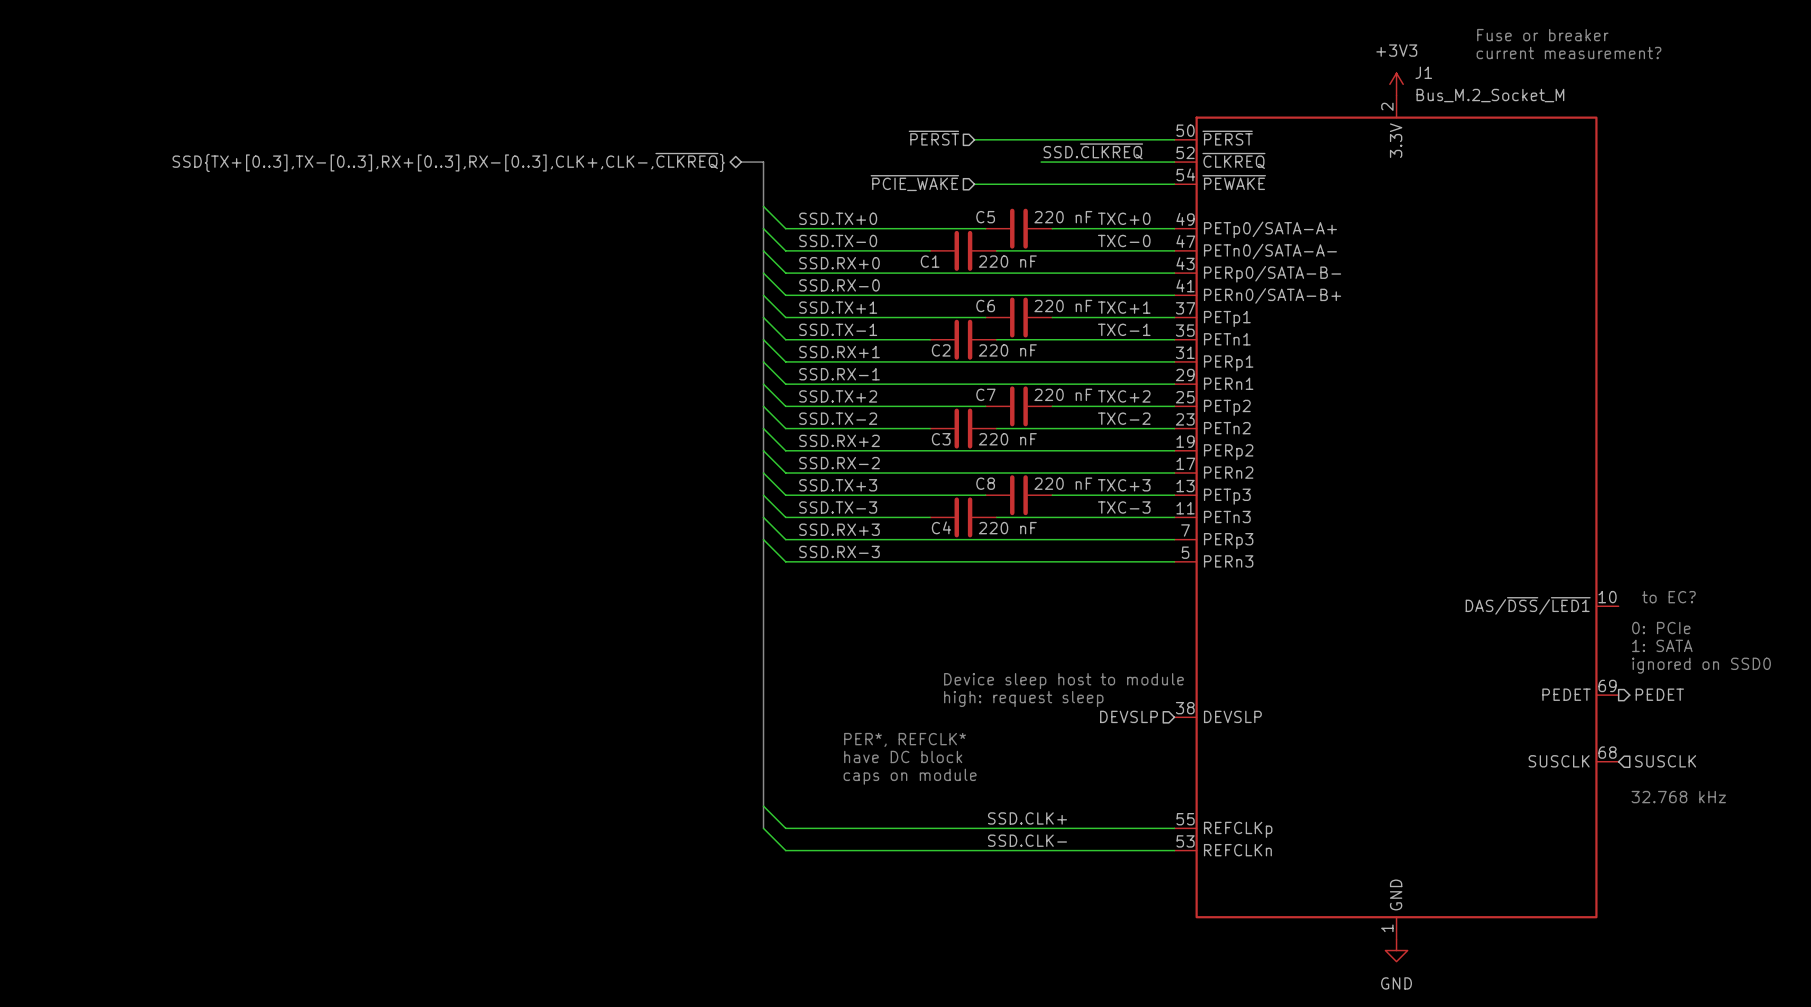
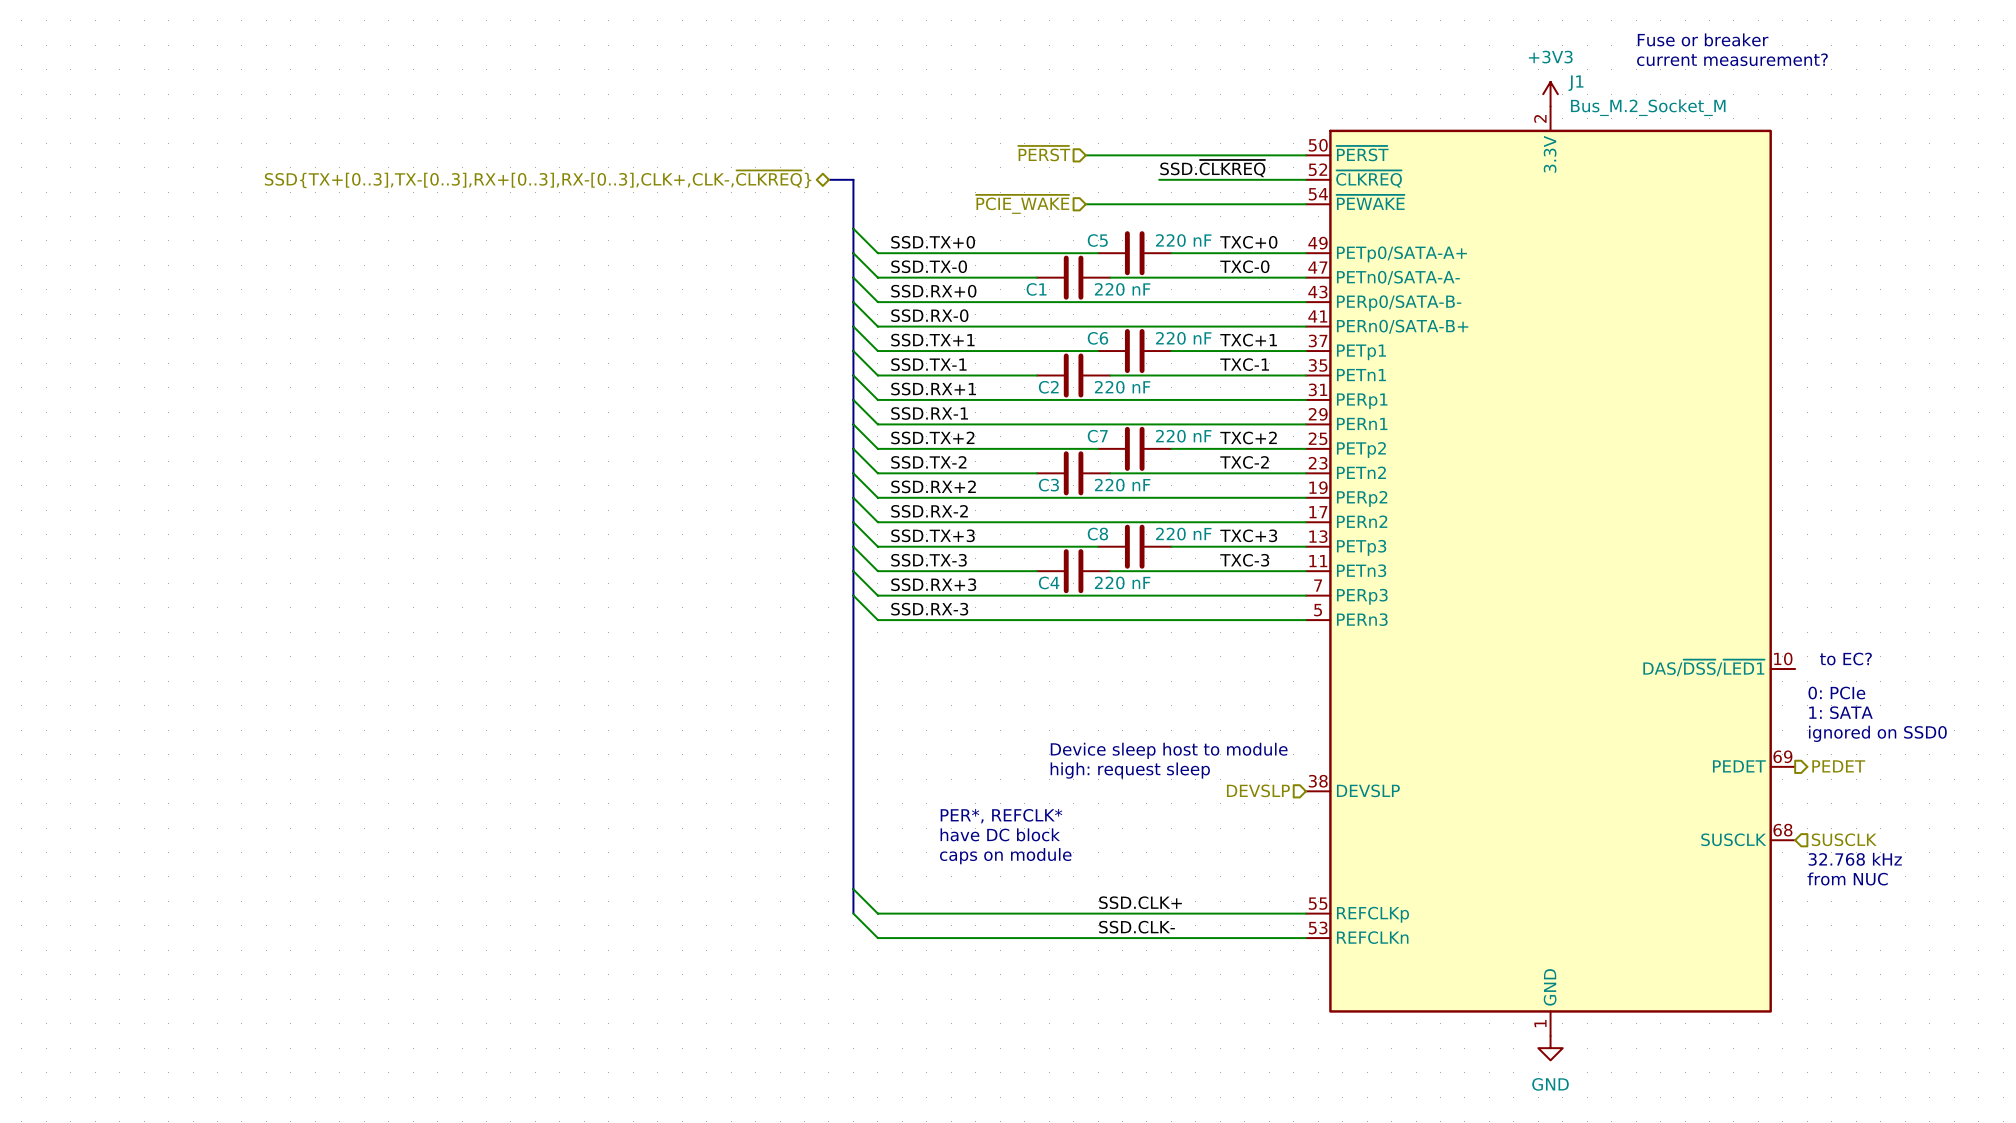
text: none -> 32.768 kHz (1855, 859)
text: 32.768 kHz (1678, 797) -> from NUC (1847, 878)

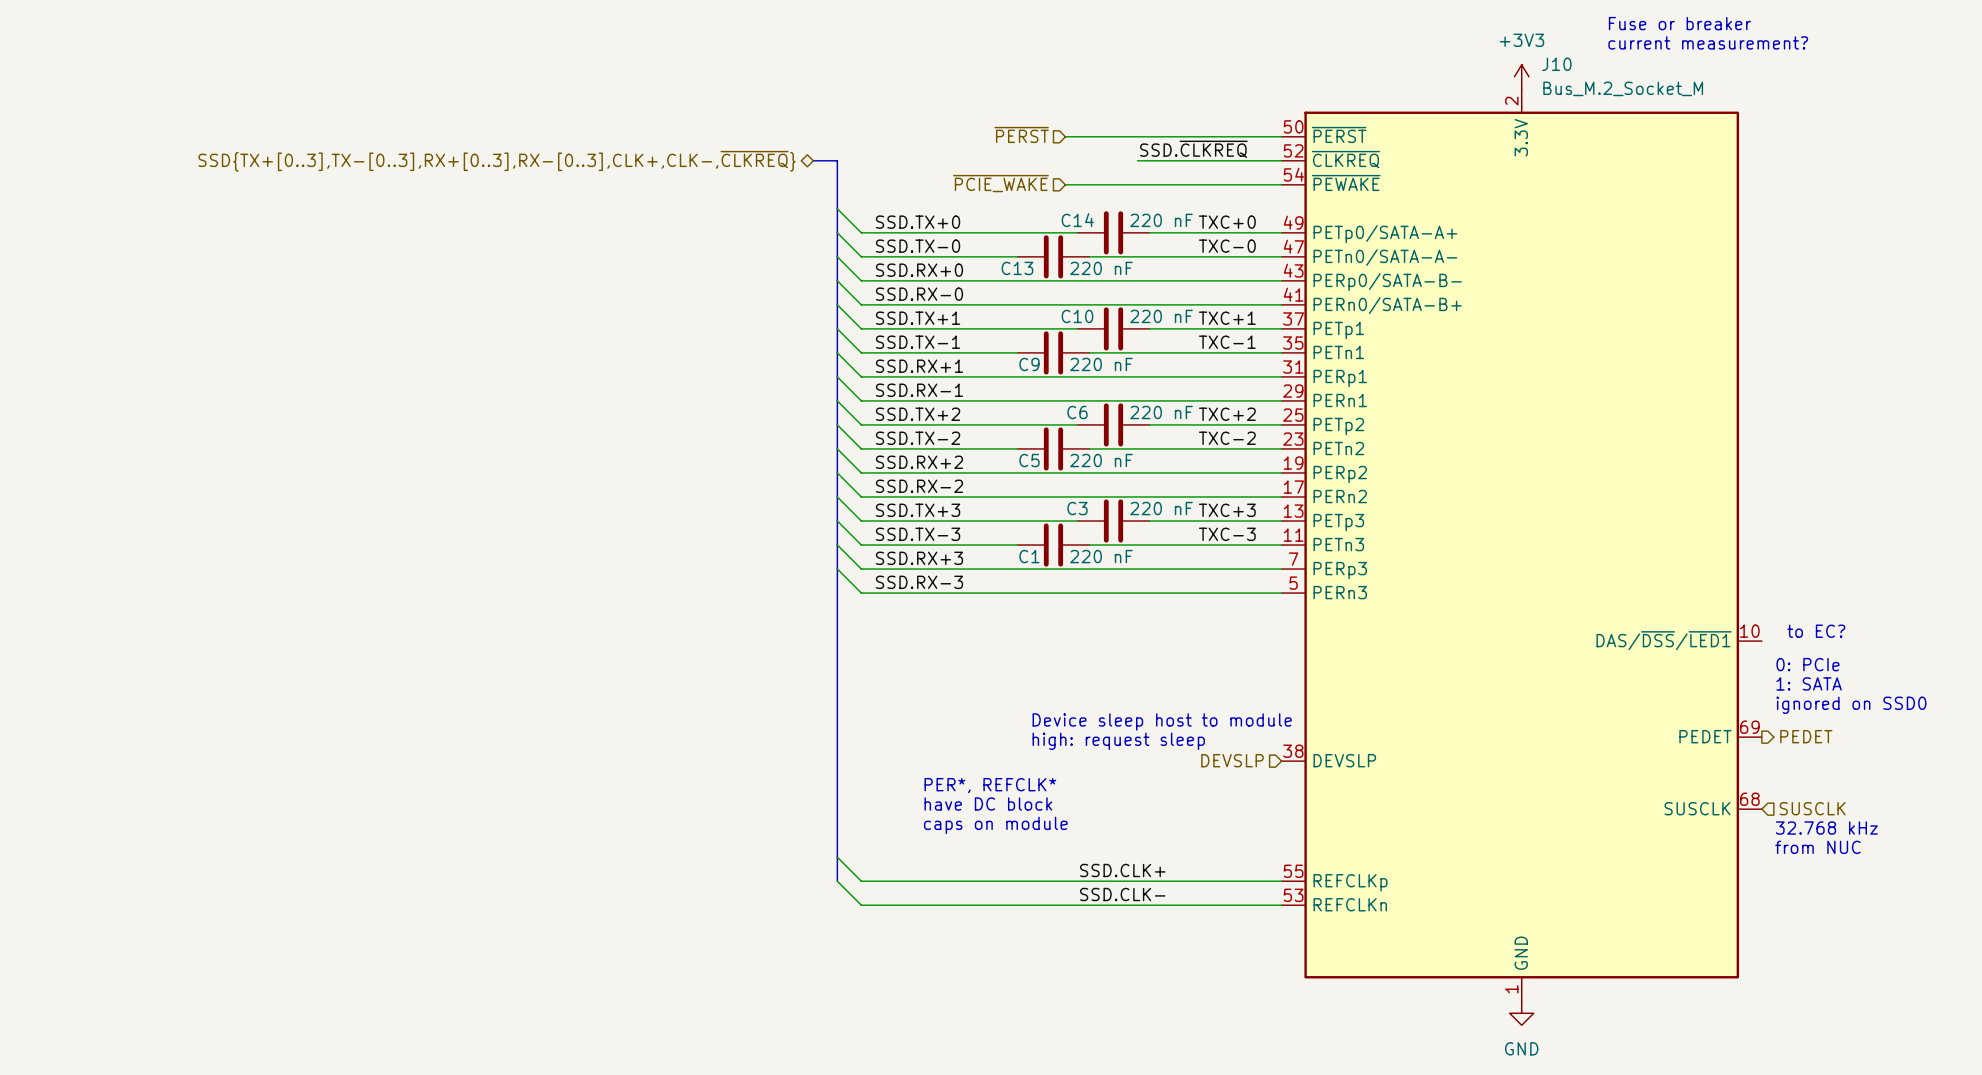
J1 name: J1 (1575, 83) -> J10 (1556, 64)
C5 name: C5 (1097, 240) -> C14 (1077, 220)
C1 name: C1 (1036, 289) -> C13 (1017, 268)
C6 name: C6 (1097, 338) -> C10 (1077, 316)
C2 name: C2 (1048, 387) -> C9 (1029, 364)
C7 name: C7 (1097, 436) -> C6 (1077, 412)
C3 name: C3 (1048, 485) -> C5 (1029, 460)
C8 name: C8 (1097, 534) -> C3 (1077, 508)
C4 name: C4 (1049, 582) -> C1 (1029, 556)

